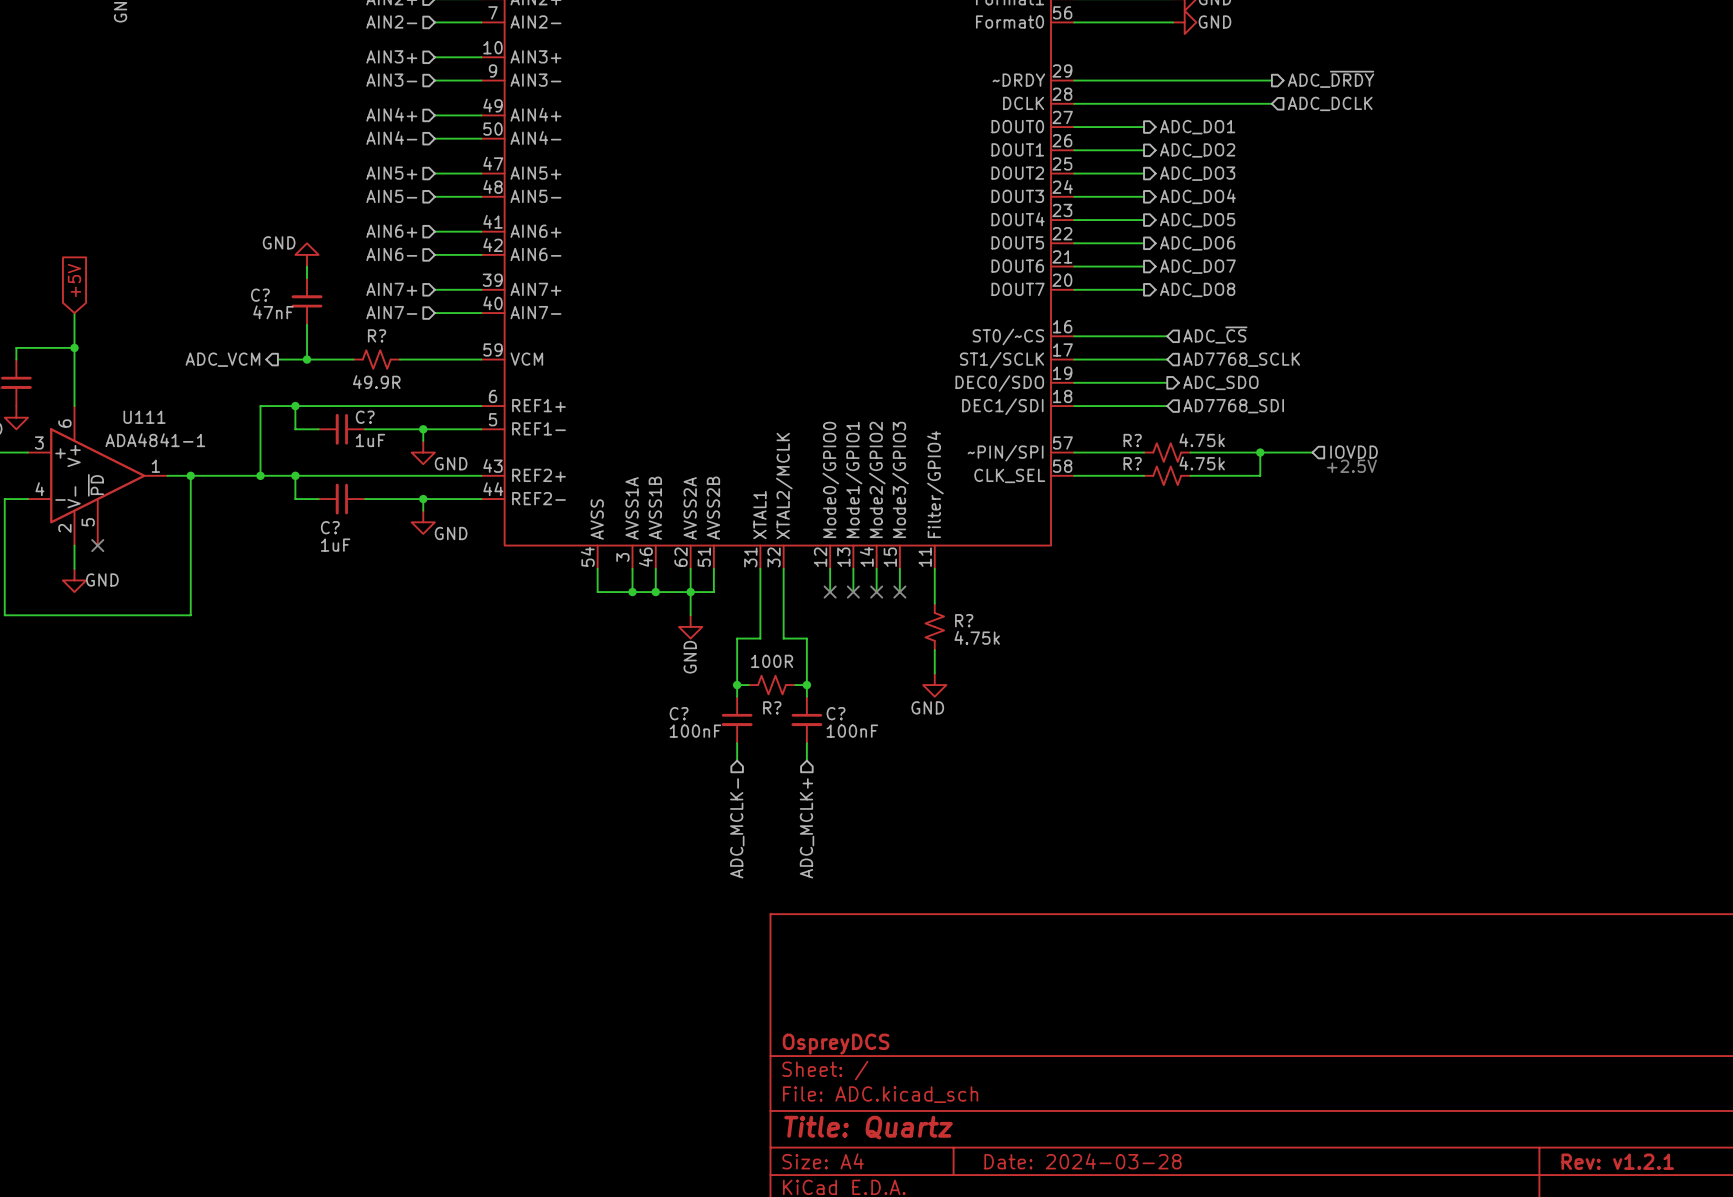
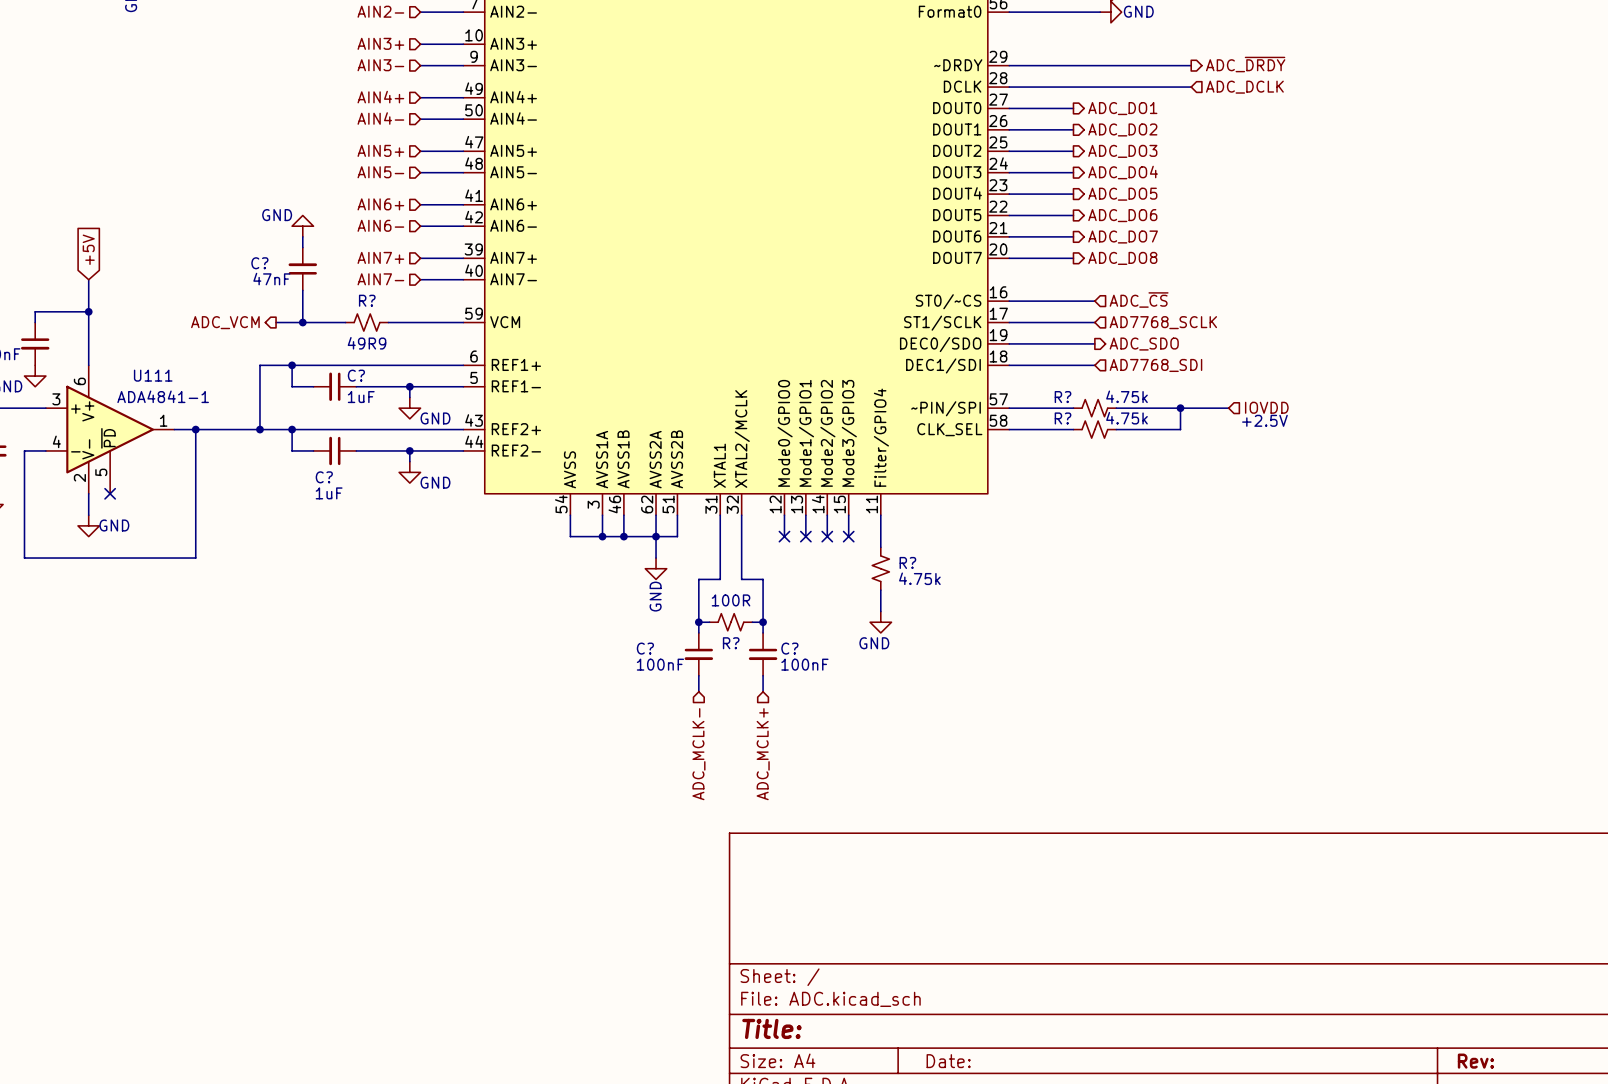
R? value: 49.9R (376, 382) -> 49R9 (367, 343)
title block: OspreyDCS (836, 1044) -> none
title block: Title: Quartz (868, 1127) -> Title: (771, 1028)
title block: Date: 2024-03-28 (1082, 1161) -> Date: (948, 1061)
title block: Rev: v1.2.1 (1617, 1161) -> Rev: (1475, 1061)

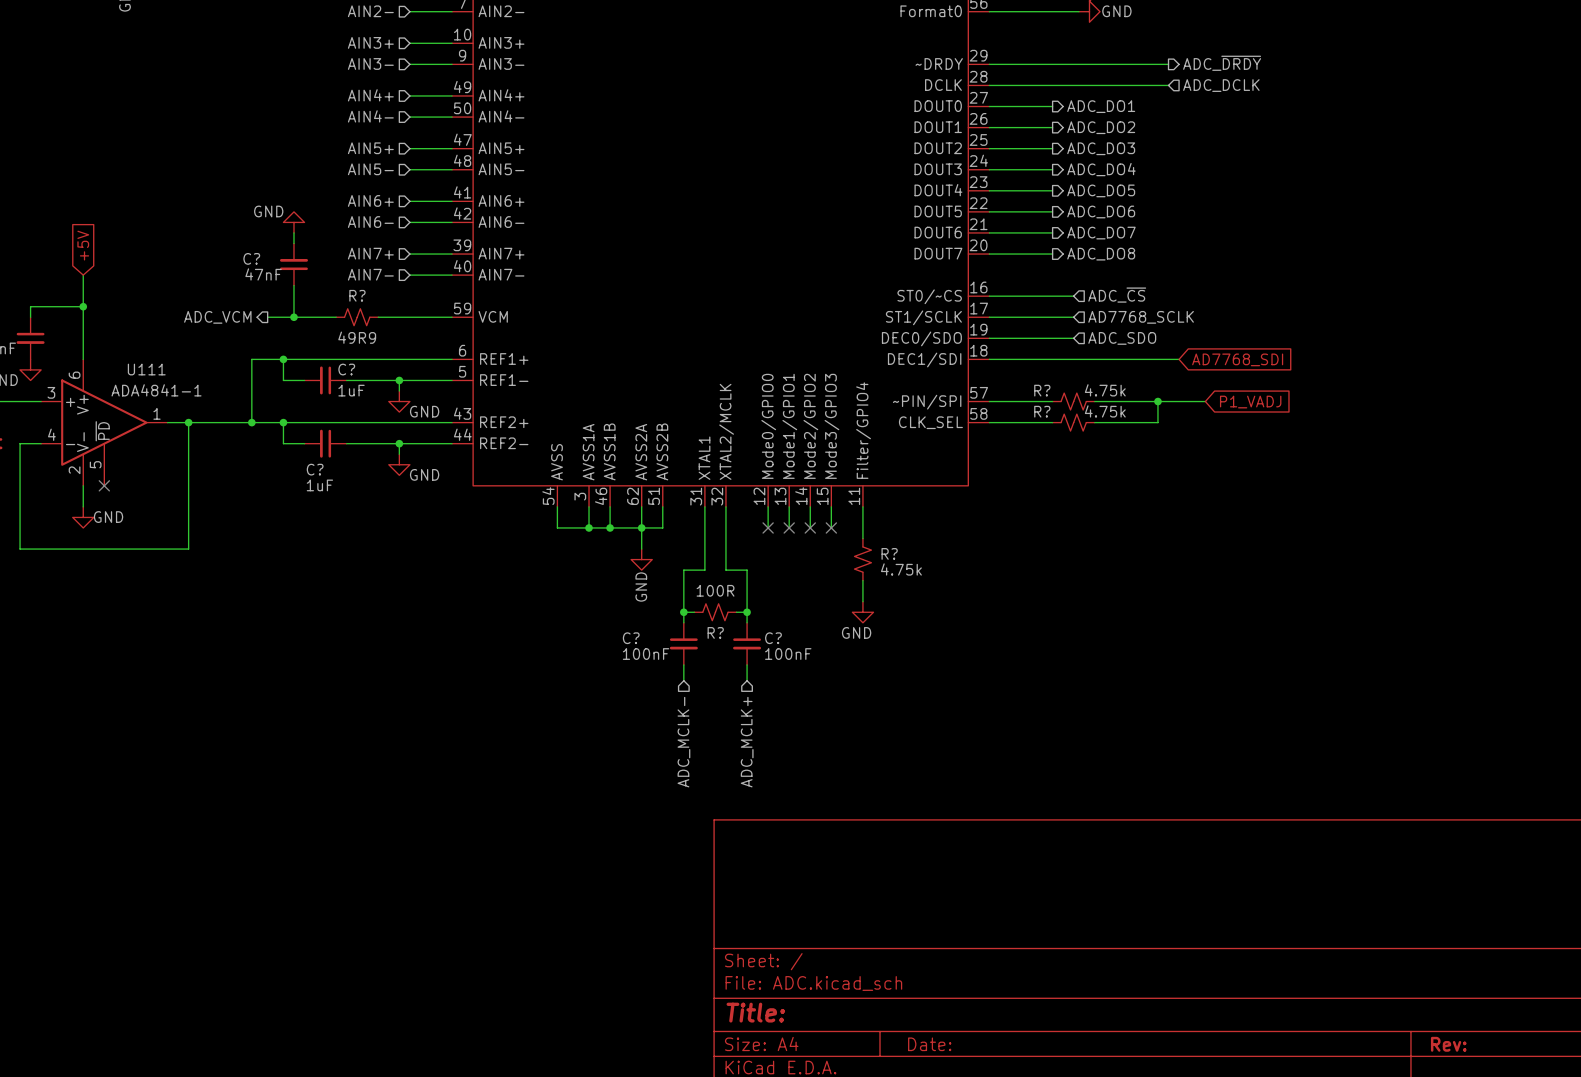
hierarchical label shape: output (1144, 344) -> input (1122, 338)
wire: none -> (1073, 359) (1179, 359)
hierarchical label: AD7768_SDI (1155, 365) -> none
global label: none -> AD7768_SDI (1237, 359)
hierarchical label: IOVDD (1266, 407) -> none
global label: none -> P1_VADJ (1250, 402)
text: +2.5V (1264, 420) -> none

